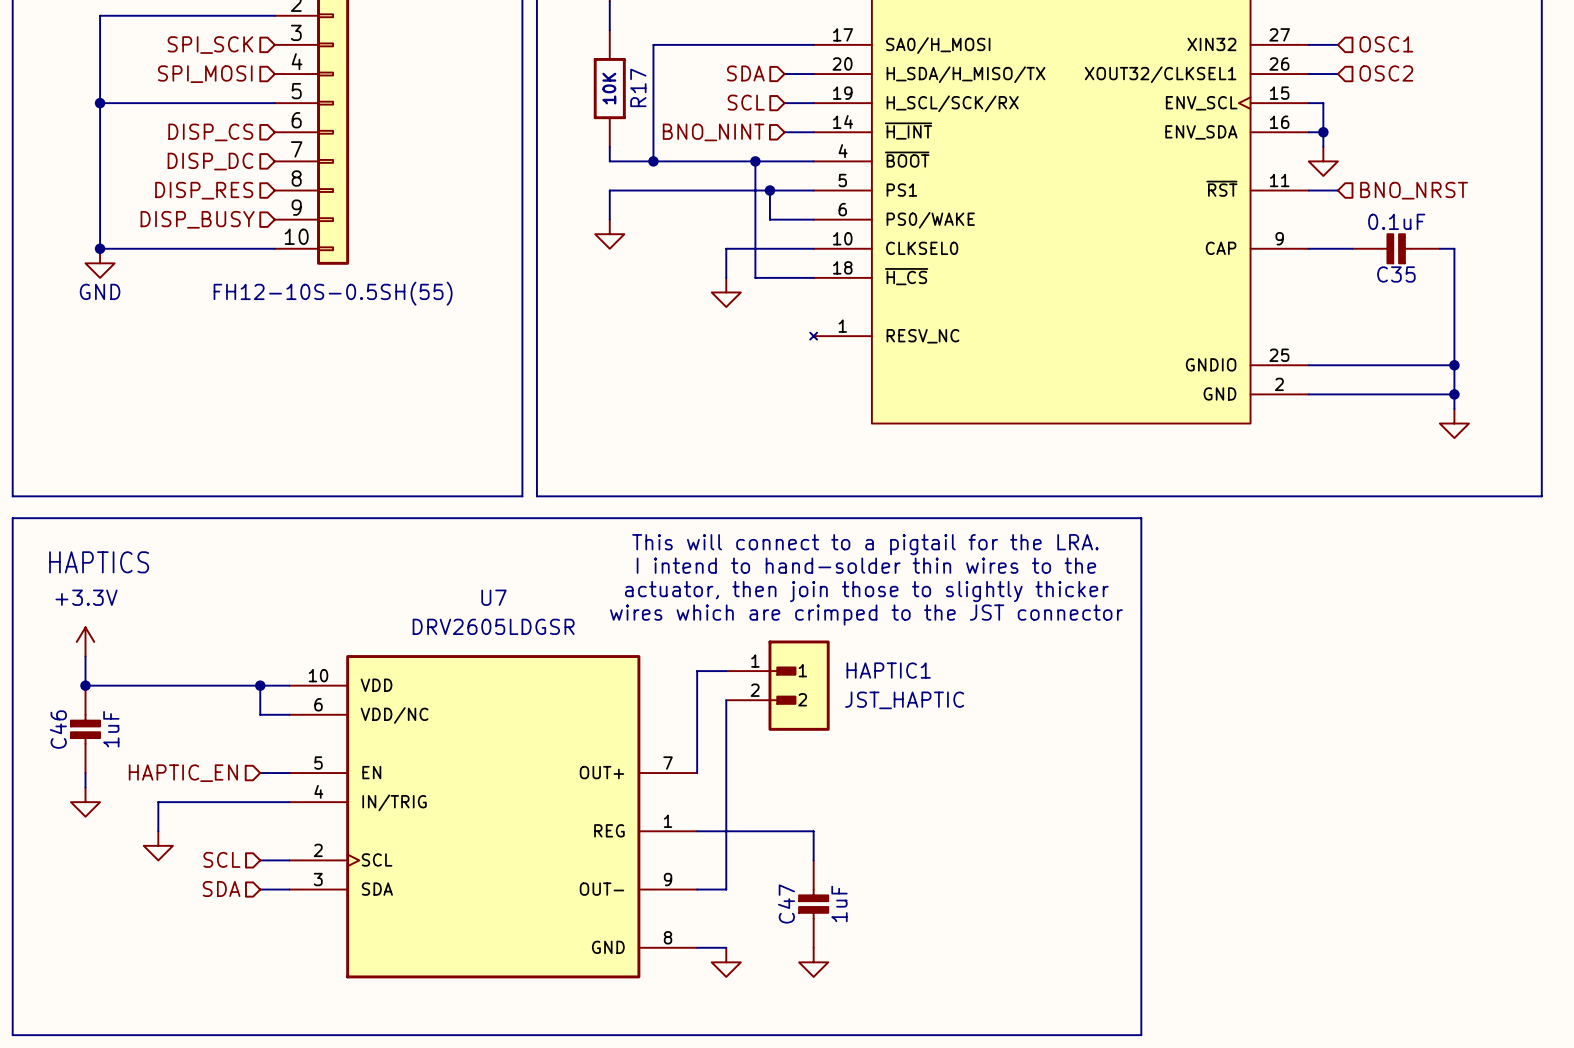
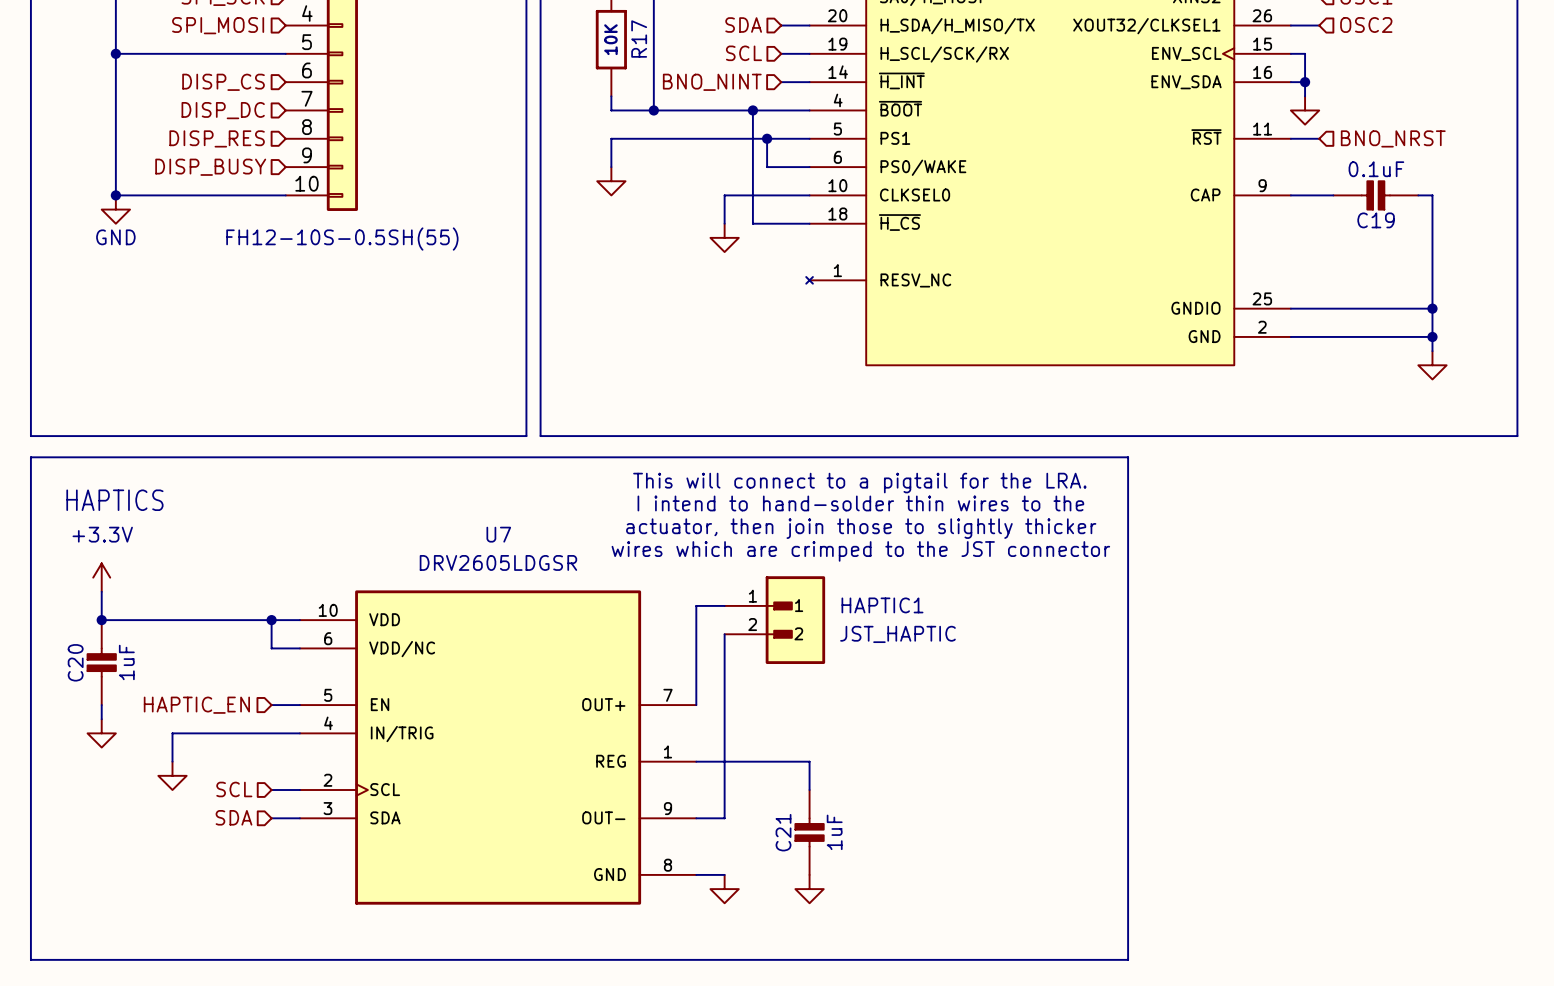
C35 name: C35 (1396, 274) -> C19 (1376, 220)
C46 name: C46 (58, 729) -> C20 (75, 662)
C47 name: C47 (786, 903) -> C21 (783, 832)

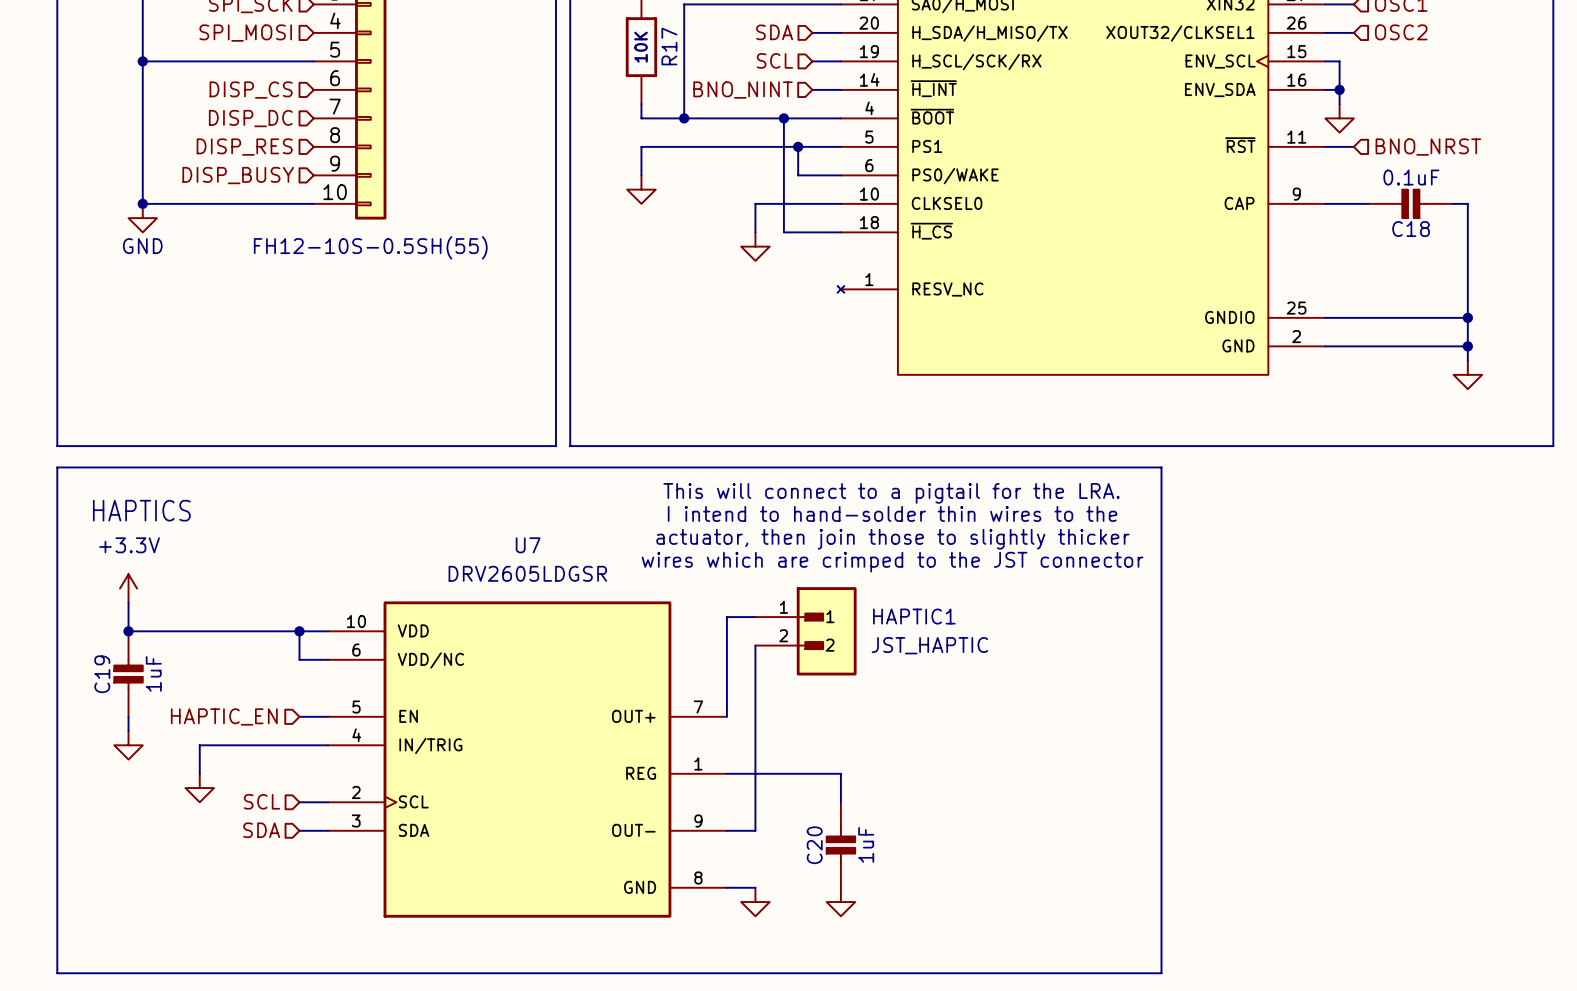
C19 name: C19 (1376, 220) -> C18 (1411, 229)
C20 name: C20 (75, 662) -> C19 (102, 674)
C21 name: C21 (783, 832) -> C20 (814, 845)

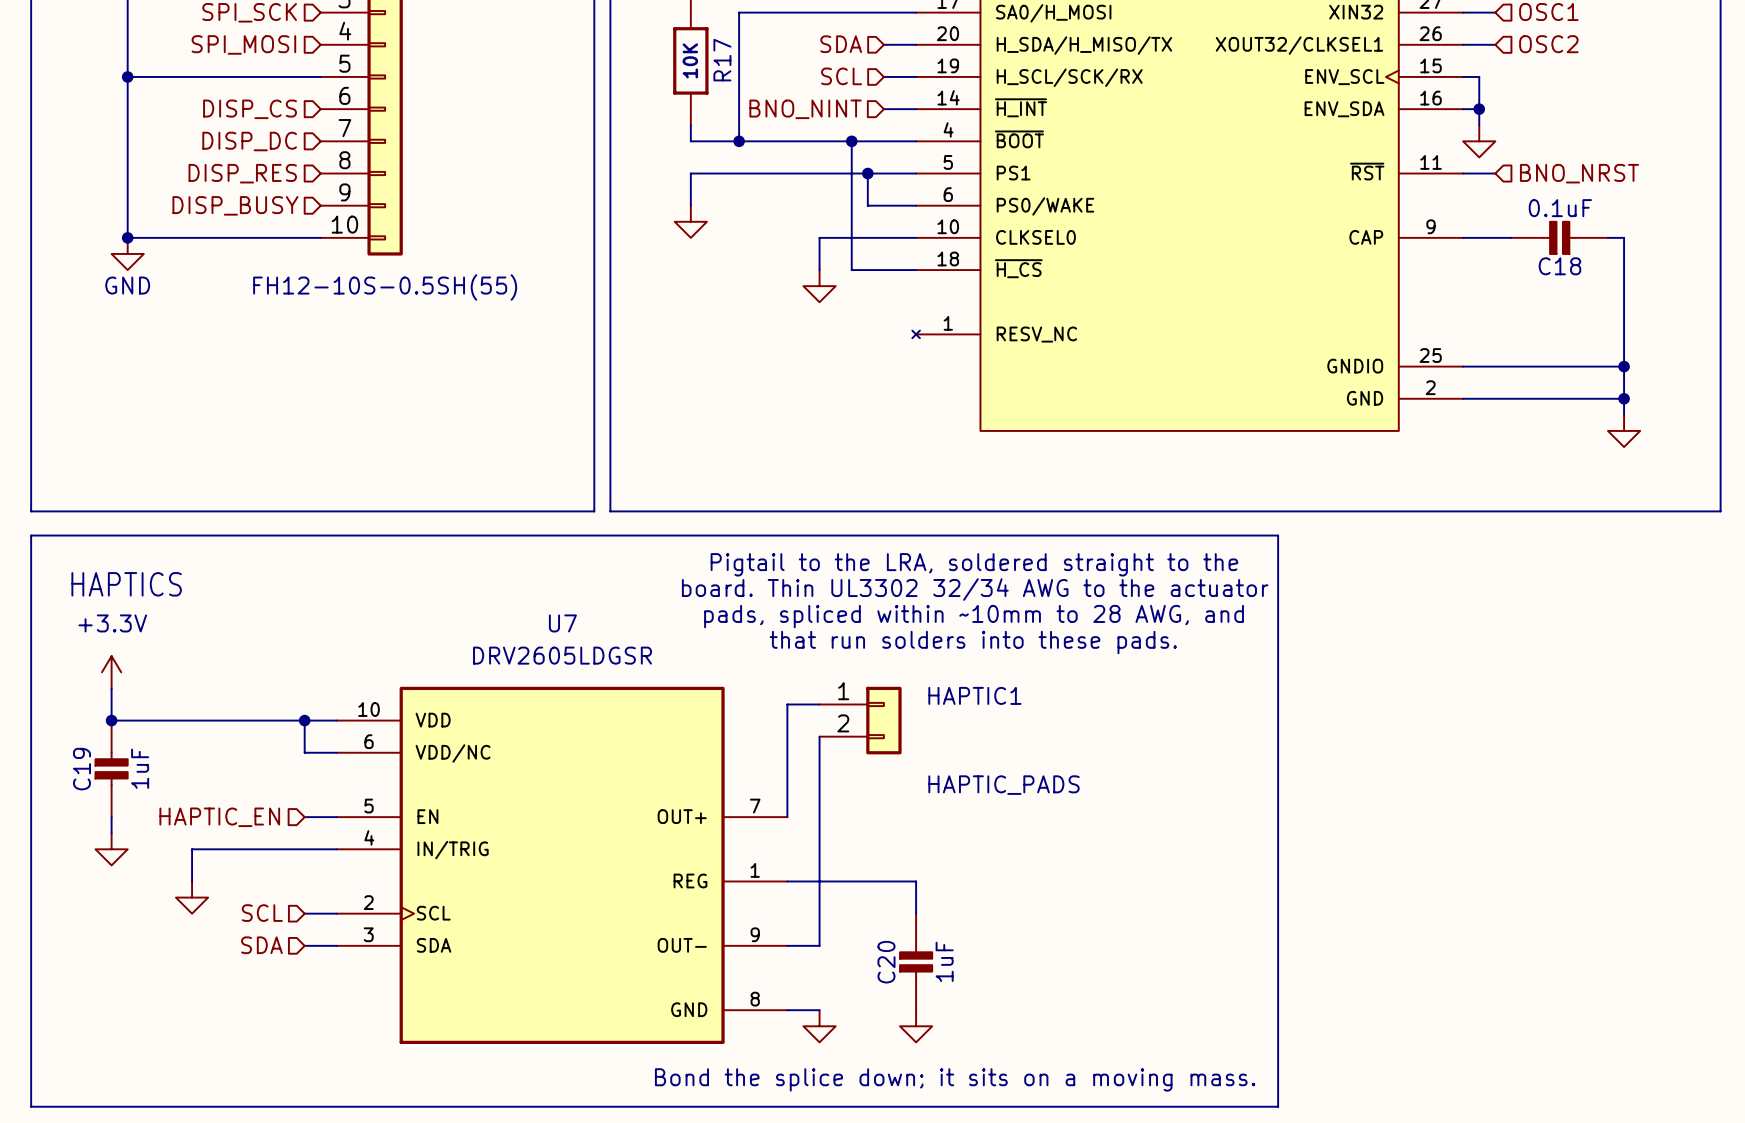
text: This will connect to a pigtail for the LRA. (891, 493) -> Pigtail to the LRA, soldered straight to the (974, 564)
text: I intend to hand-solder thin wires to the (892, 513) -> board. Thin UL3302 32/34 AWG to the actuator (975, 589)
text: actuator, then join those to slightly thicker (892, 539) -> pads, spliced within ~10mm to 28 AWG, and (974, 616)
text: wires which are crimped to the JST connector (892, 562) -> that run solders into these pads. (973, 642)
HAPTIC1 symbol: [755, 587, 857, 676] -> [819, 686, 902, 755]
HAPTIC1 value: JST_HAPTIC (929, 645) -> HAPTIC_PADS (1004, 785)
text: none -> Bond the splice down; it sits on a moving mass. (955, 1079)

